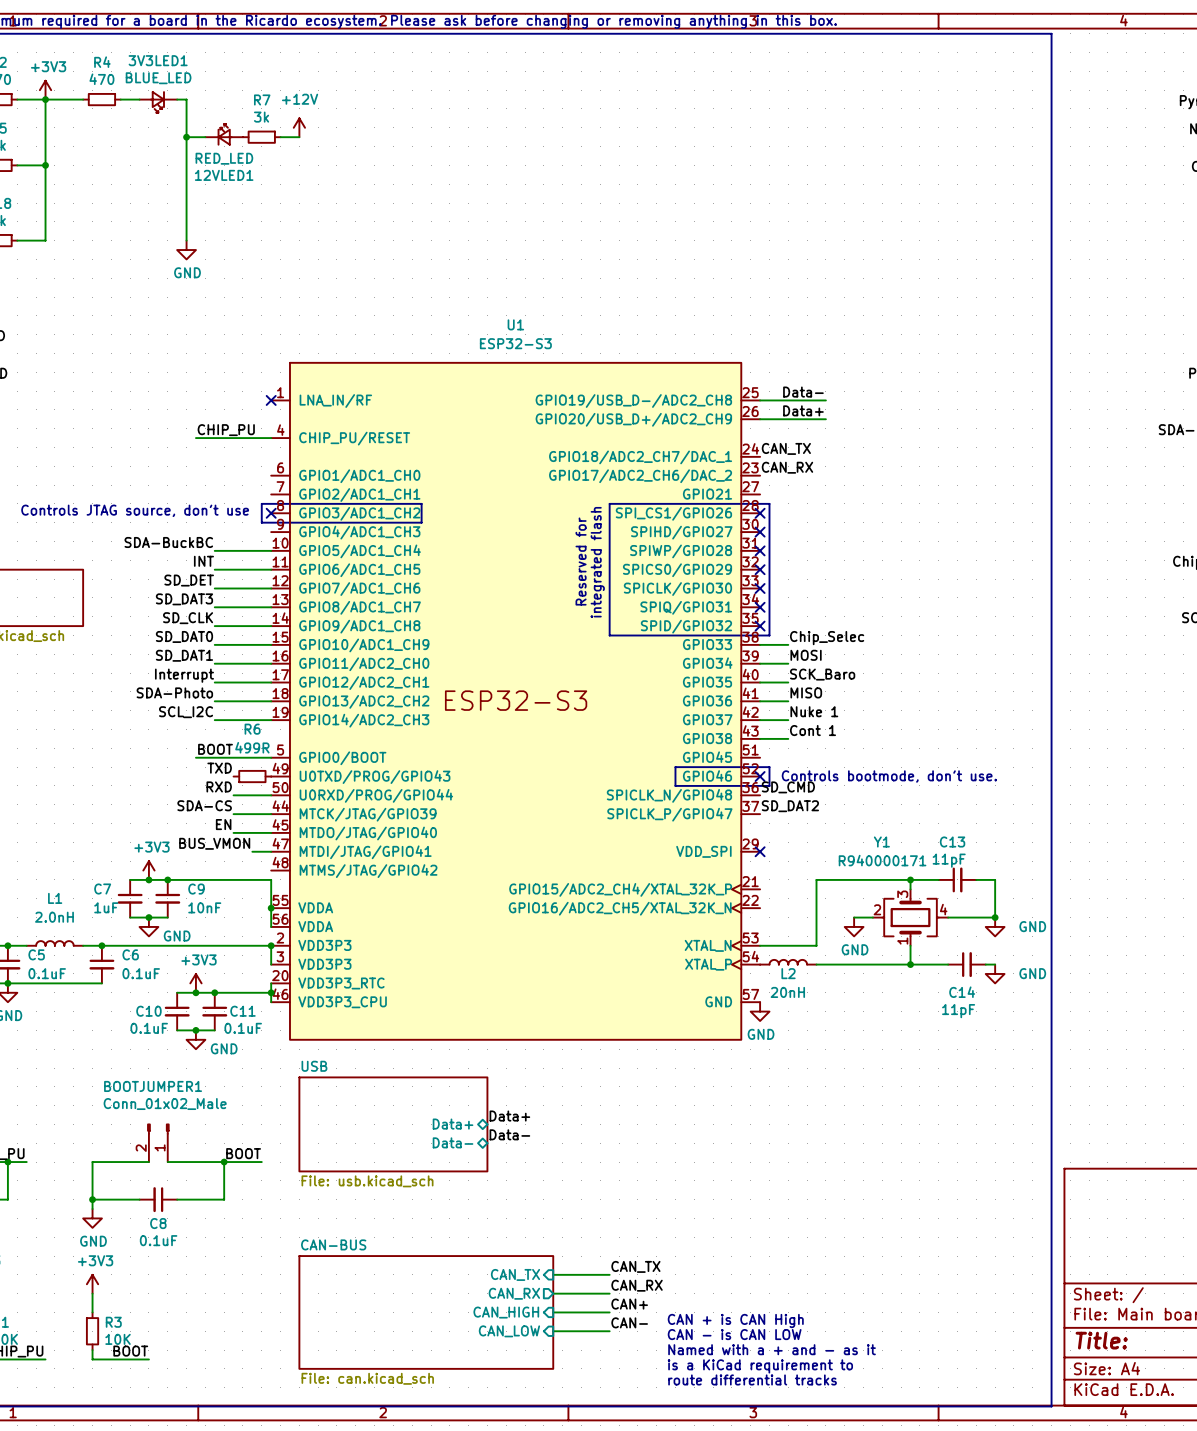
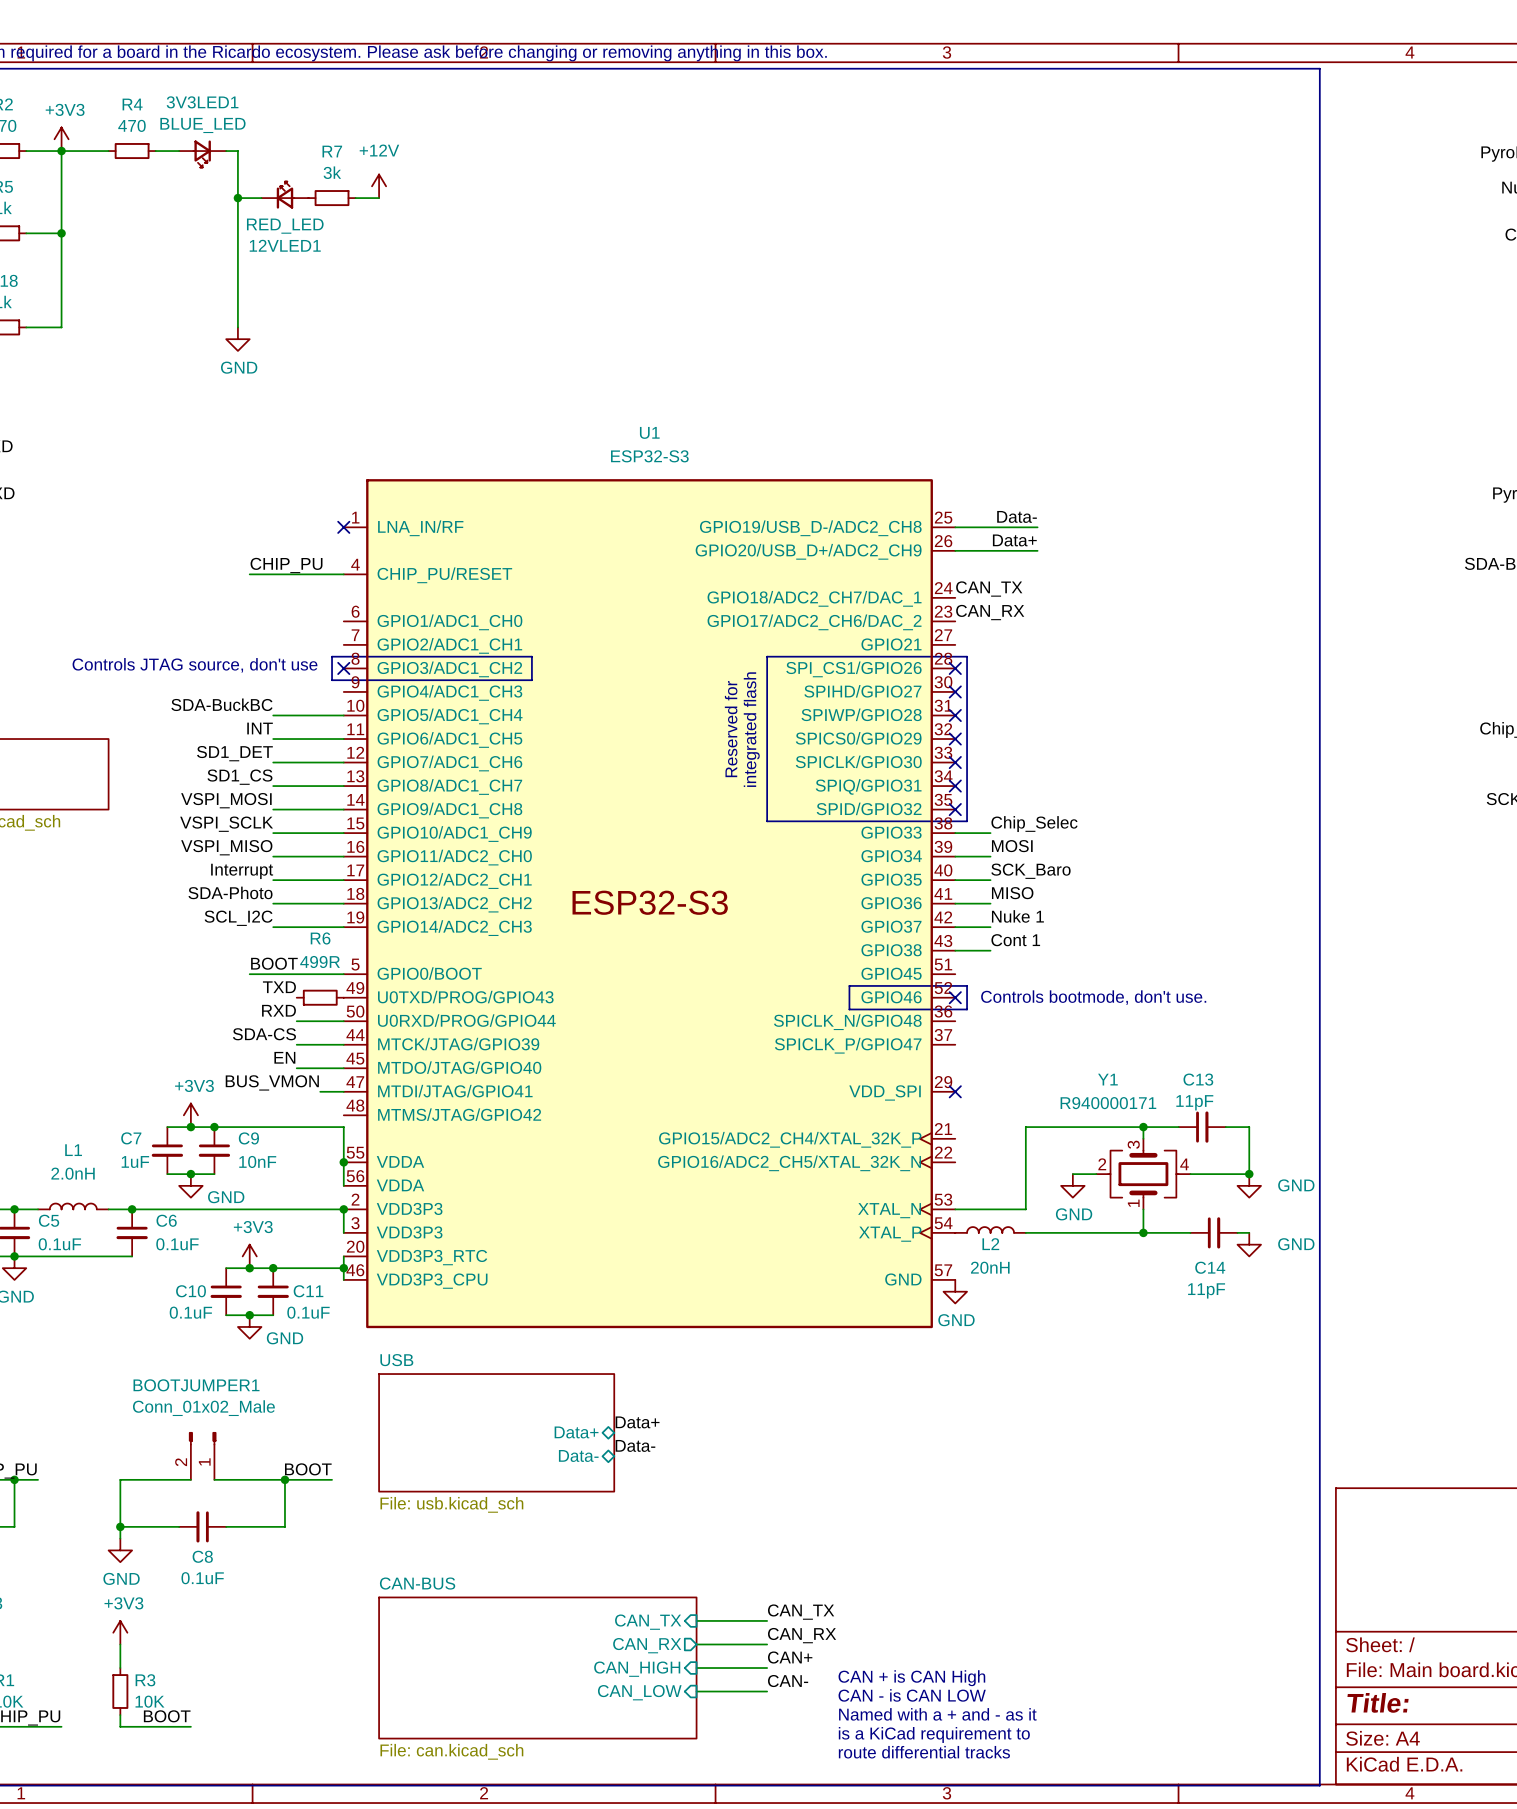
label: SD_DET (189, 580) -> SD1_DET (234, 753)
label: SD_DAT3 (184, 599) -> SD1_CS (239, 777)
label: SD_CLK (188, 618) -> VSPI_MOSI (226, 800)
label: SD_DAT0 (184, 636) -> VSPI_SCLK (226, 824)
label: SD_DAT1 (184, 655) -> VSPI_MISO (226, 847)
label: SD_CMD (788, 787) -> none
label: SD_DAT2 (790, 806) -> none

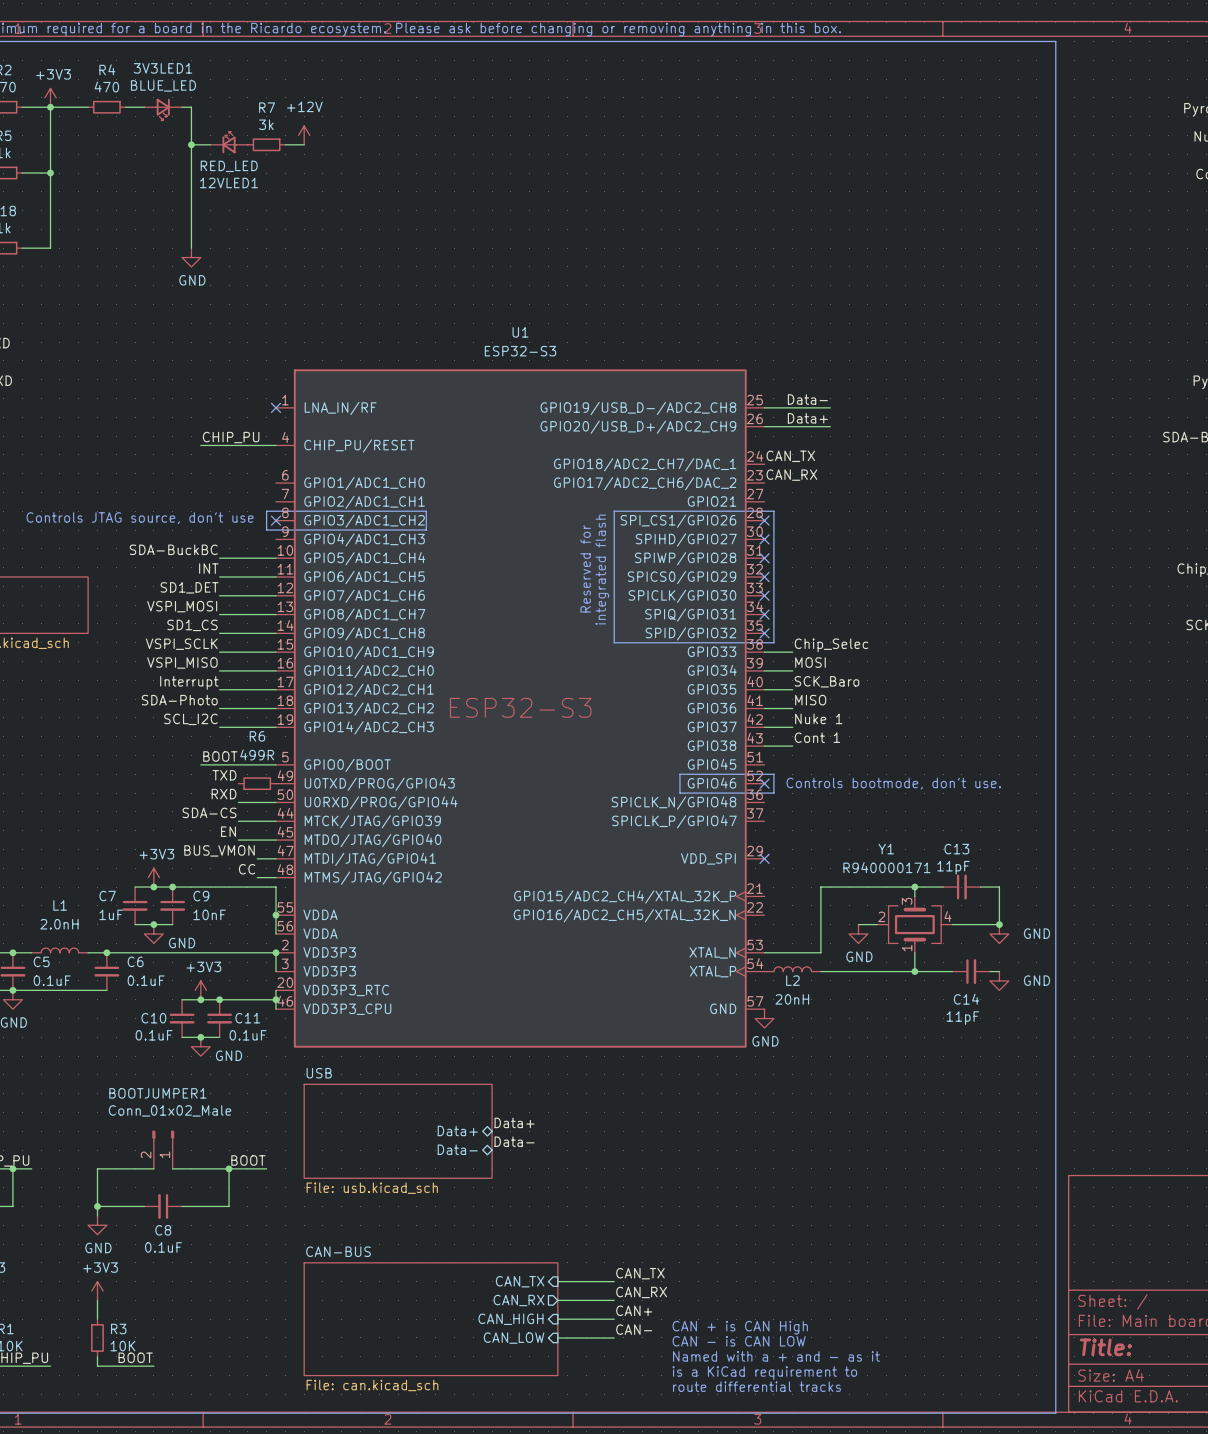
label: SD1_CS (239, 777) -> VSPI_MOSI (182, 606)
label: VSPI_MOSI (226, 800) -> SD1_CS (192, 625)
label: none -> CC (247, 869)
wire: none -> (257, 877) (275, 877)

